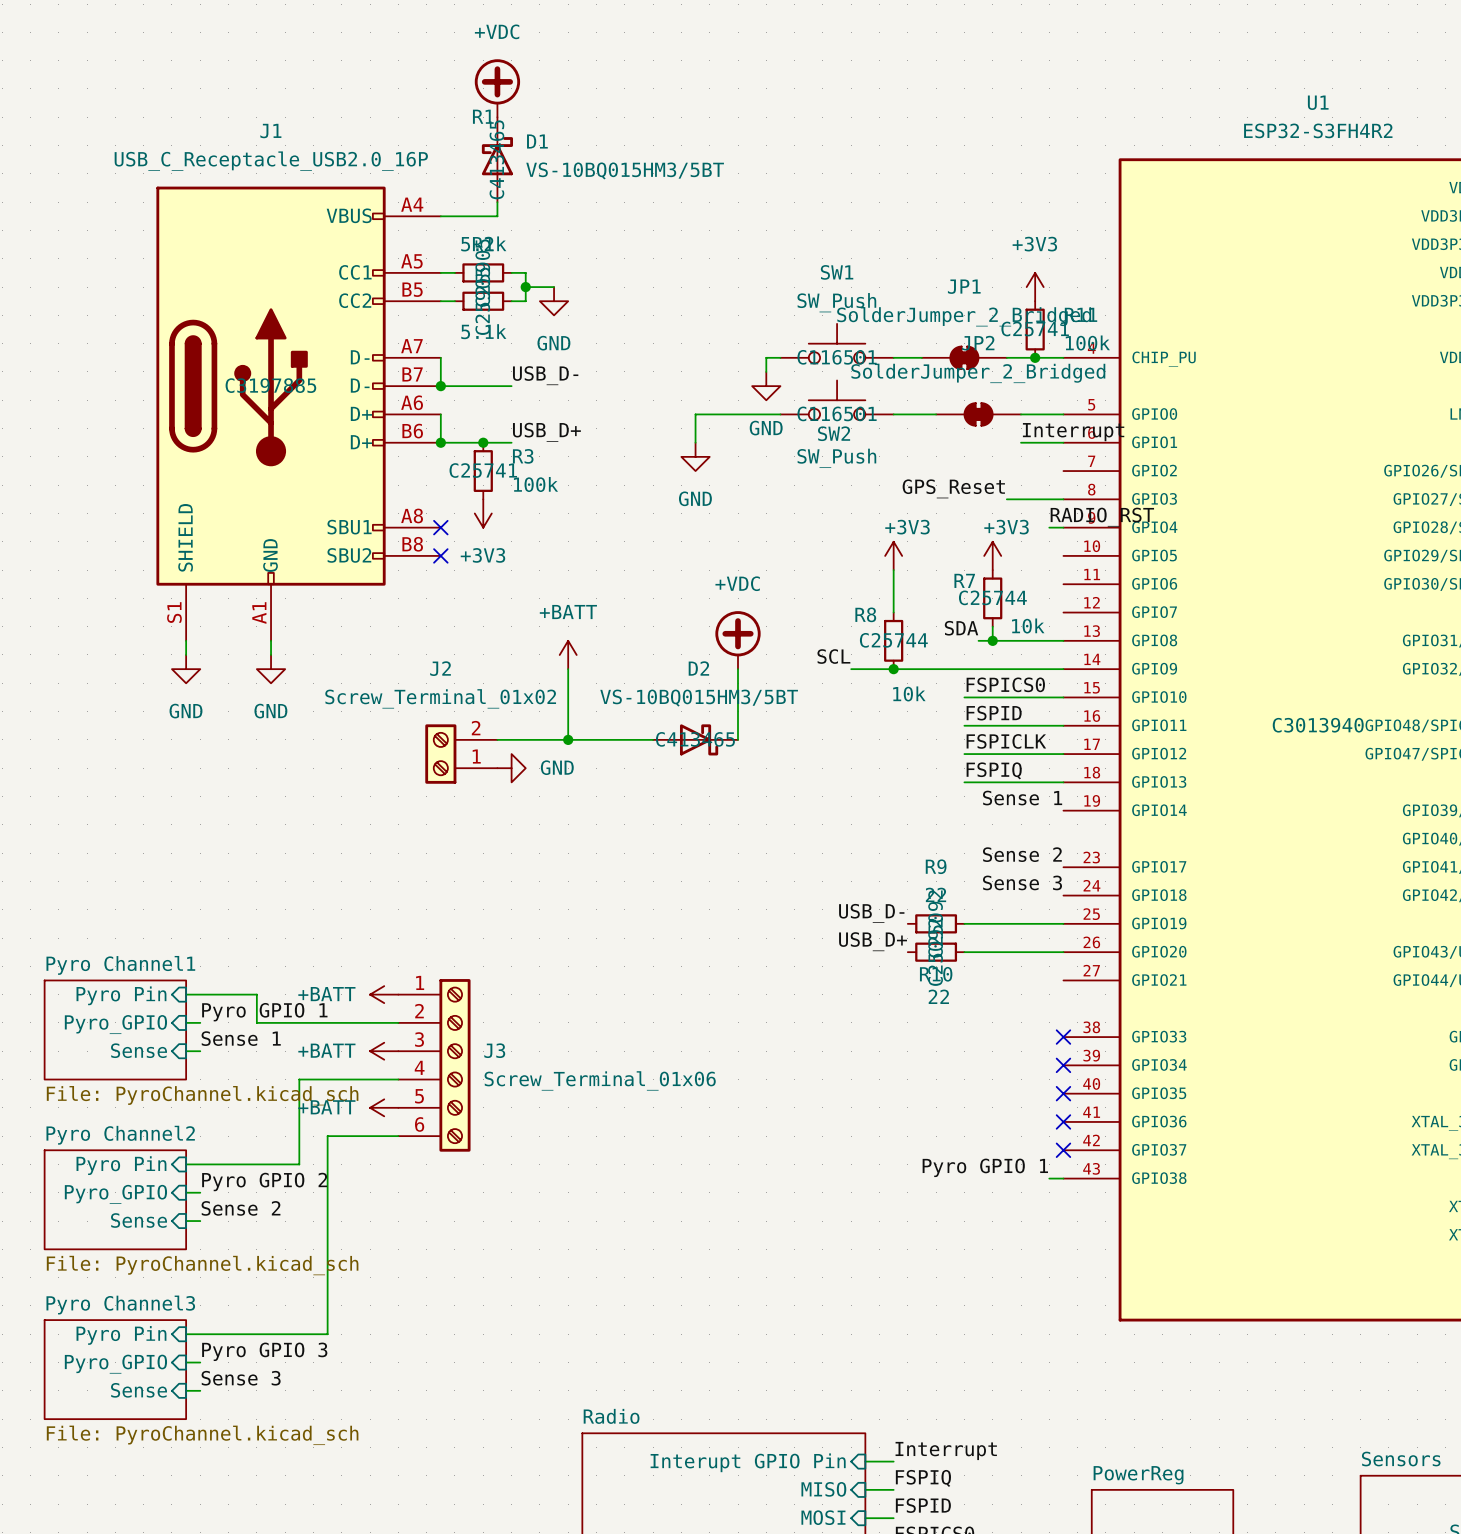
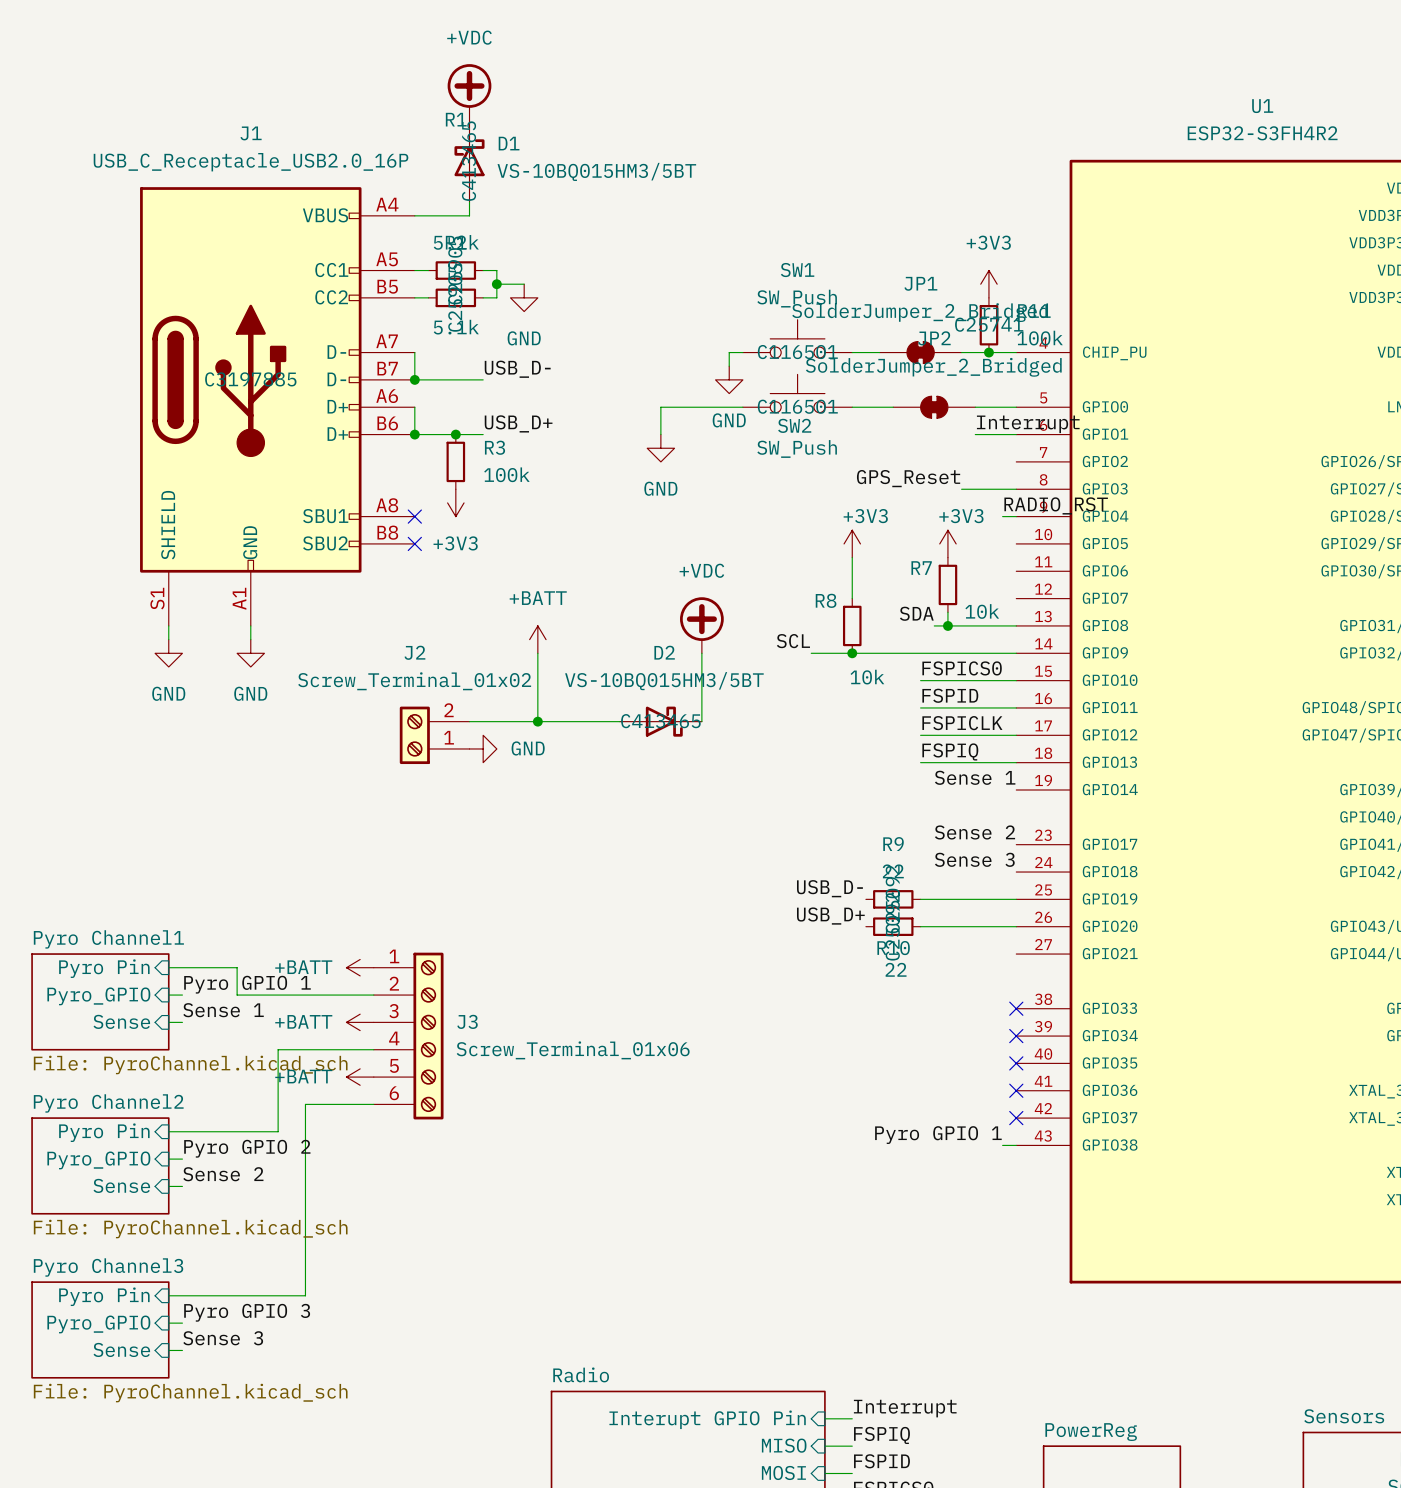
R3 text: C25741 (483, 470) -> none
R7 text: C25744 (992, 597) -> none
R8 text: C25744 (893, 640) -> none
U1 text: C3013940 (1318, 725) -> none

